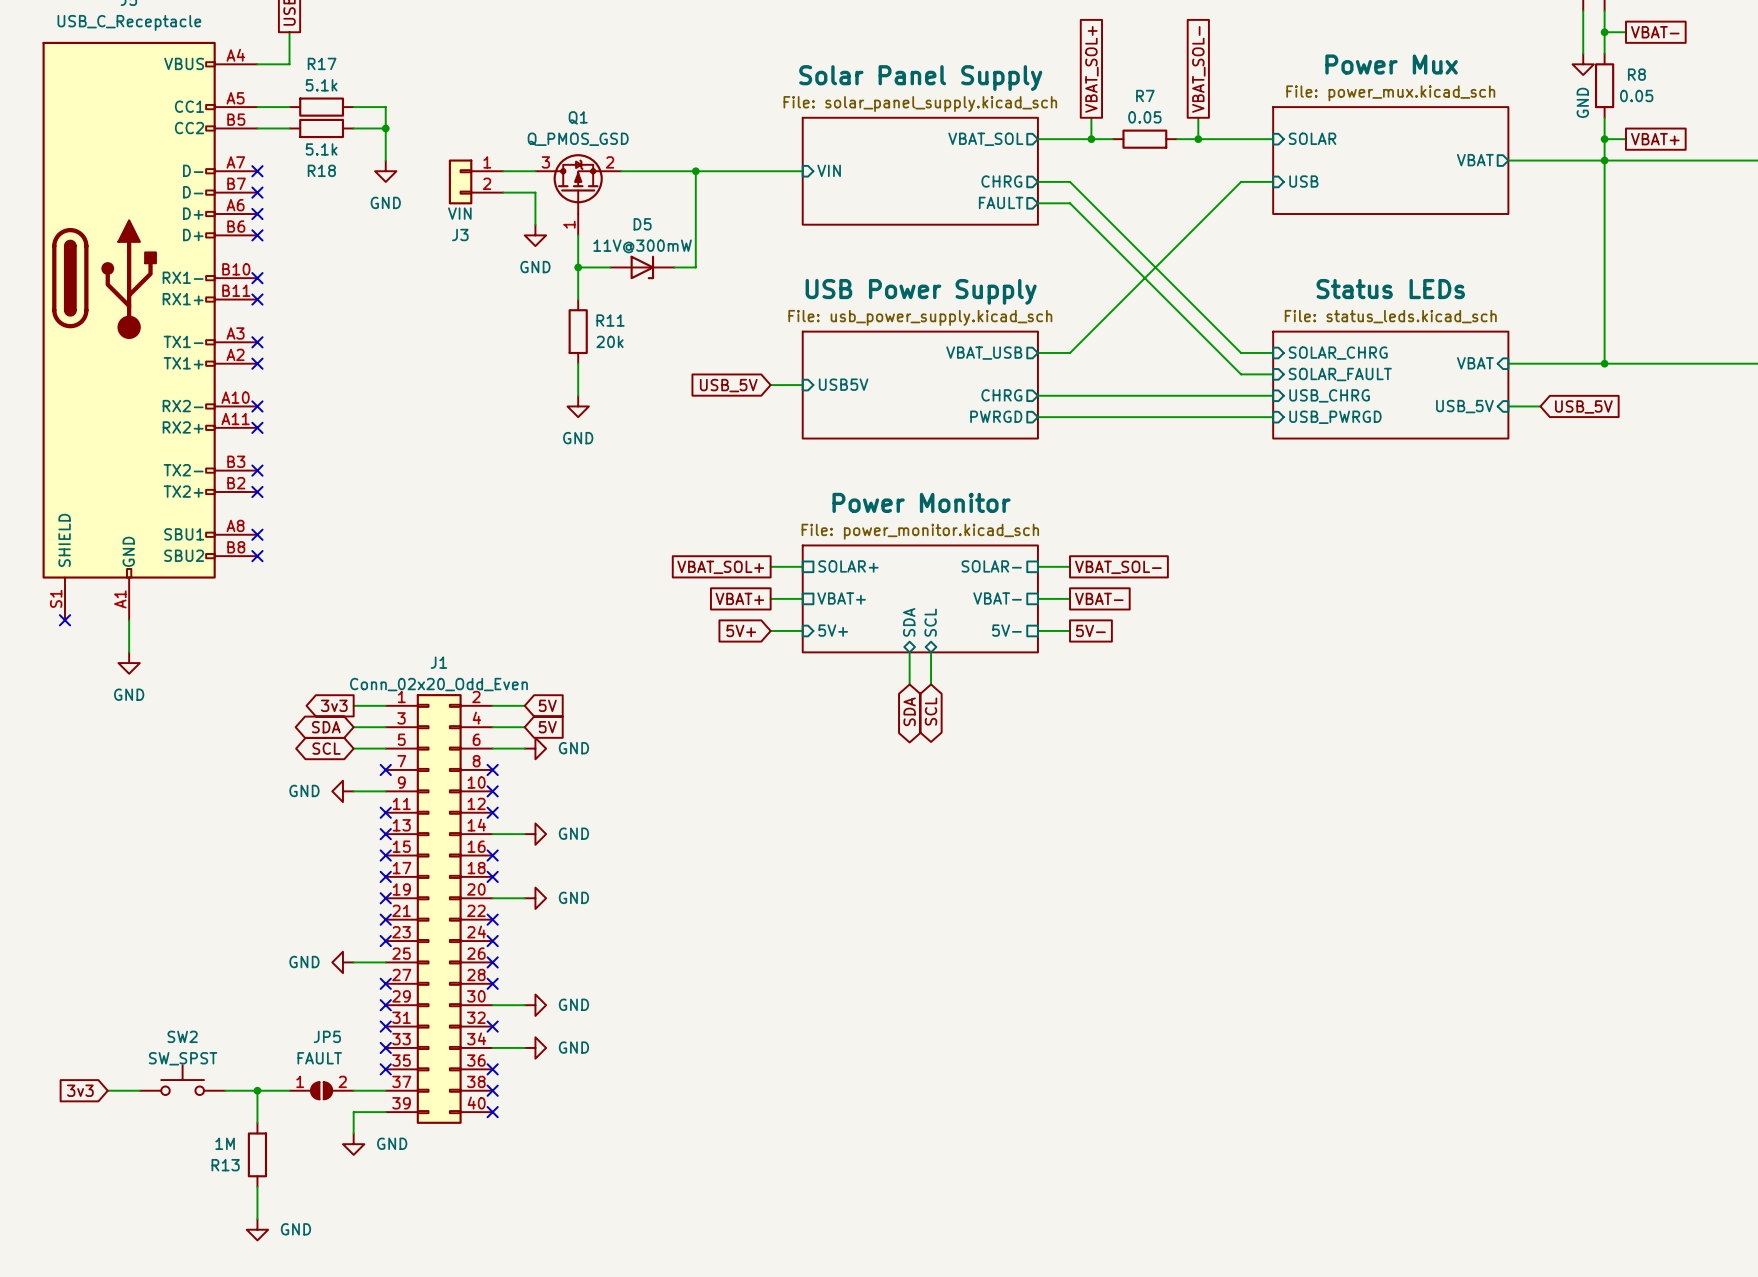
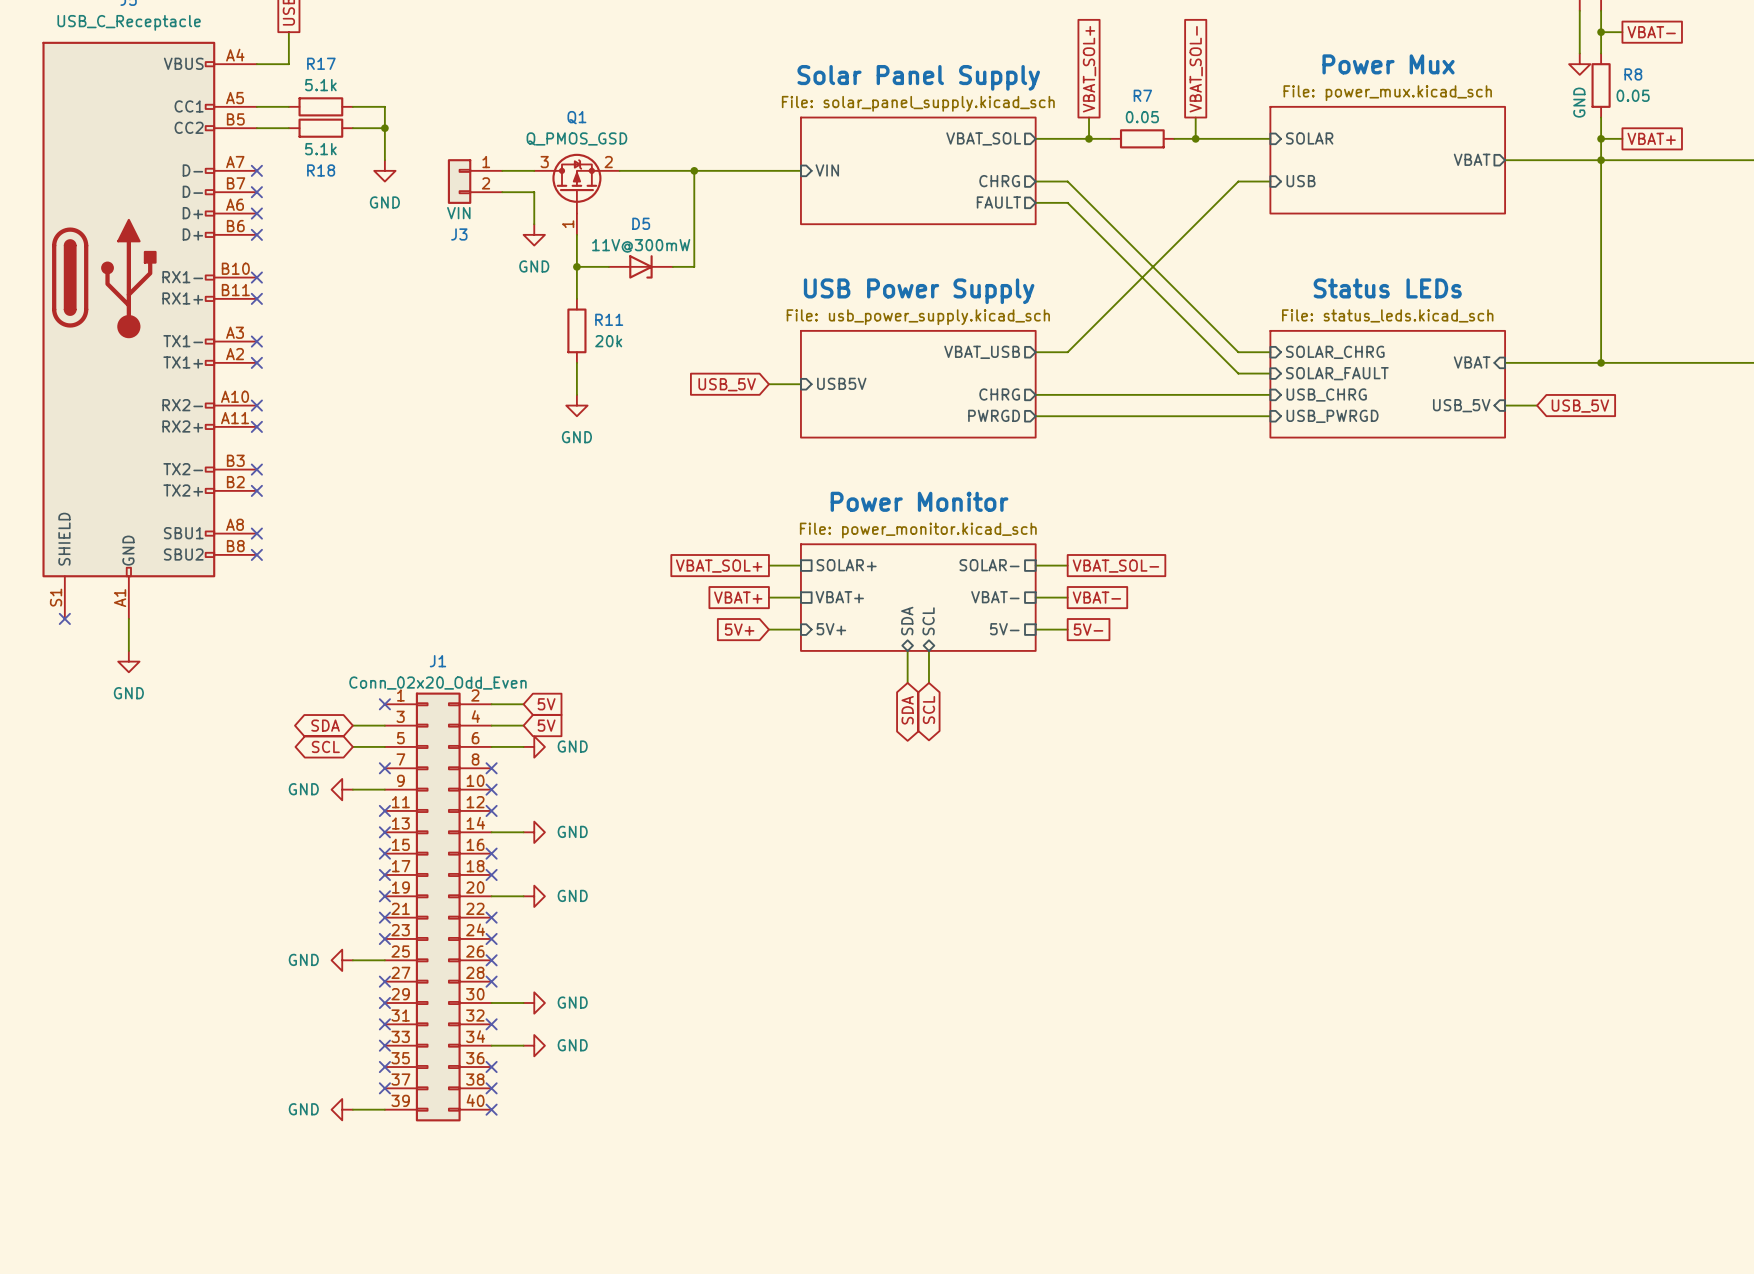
global label: 3v3 (334, 705) -> none
wire: (353, 705) (385, 705) -> none
no-connect mark: none -> (384, 704)
SW2: SW_SPST (182, 1080) -> none
global label: 3v3 (80, 1090) -> none
wire: (107, 1090) (139, 1090) -> none
wire: (225, 1090) (289, 1090) -> none
wire: (257, 1090) (257, 1122) -> none
junction: (257, 1090) -> none
JP5: FAULT (321, 1090) -> none
wire: (353, 1090) (385, 1090) -> none
no-connect mark: none -> (384, 1088)
wire: (353, 1112) (353, 1133) -> none
power symbol text position: GND (392, 1143) -> GND (303, 1109)
power symbol rotation: 0° (353, 1144) -> 90° clockwise (342, 1109)
power symbol position: GND (353, 1144) -> GND (342, 1109)
R13: 1M (257, 1154) -> none
wire: (257, 1186) (257, 1219) -> none
power symbol: GND (257, 1229) -> none

